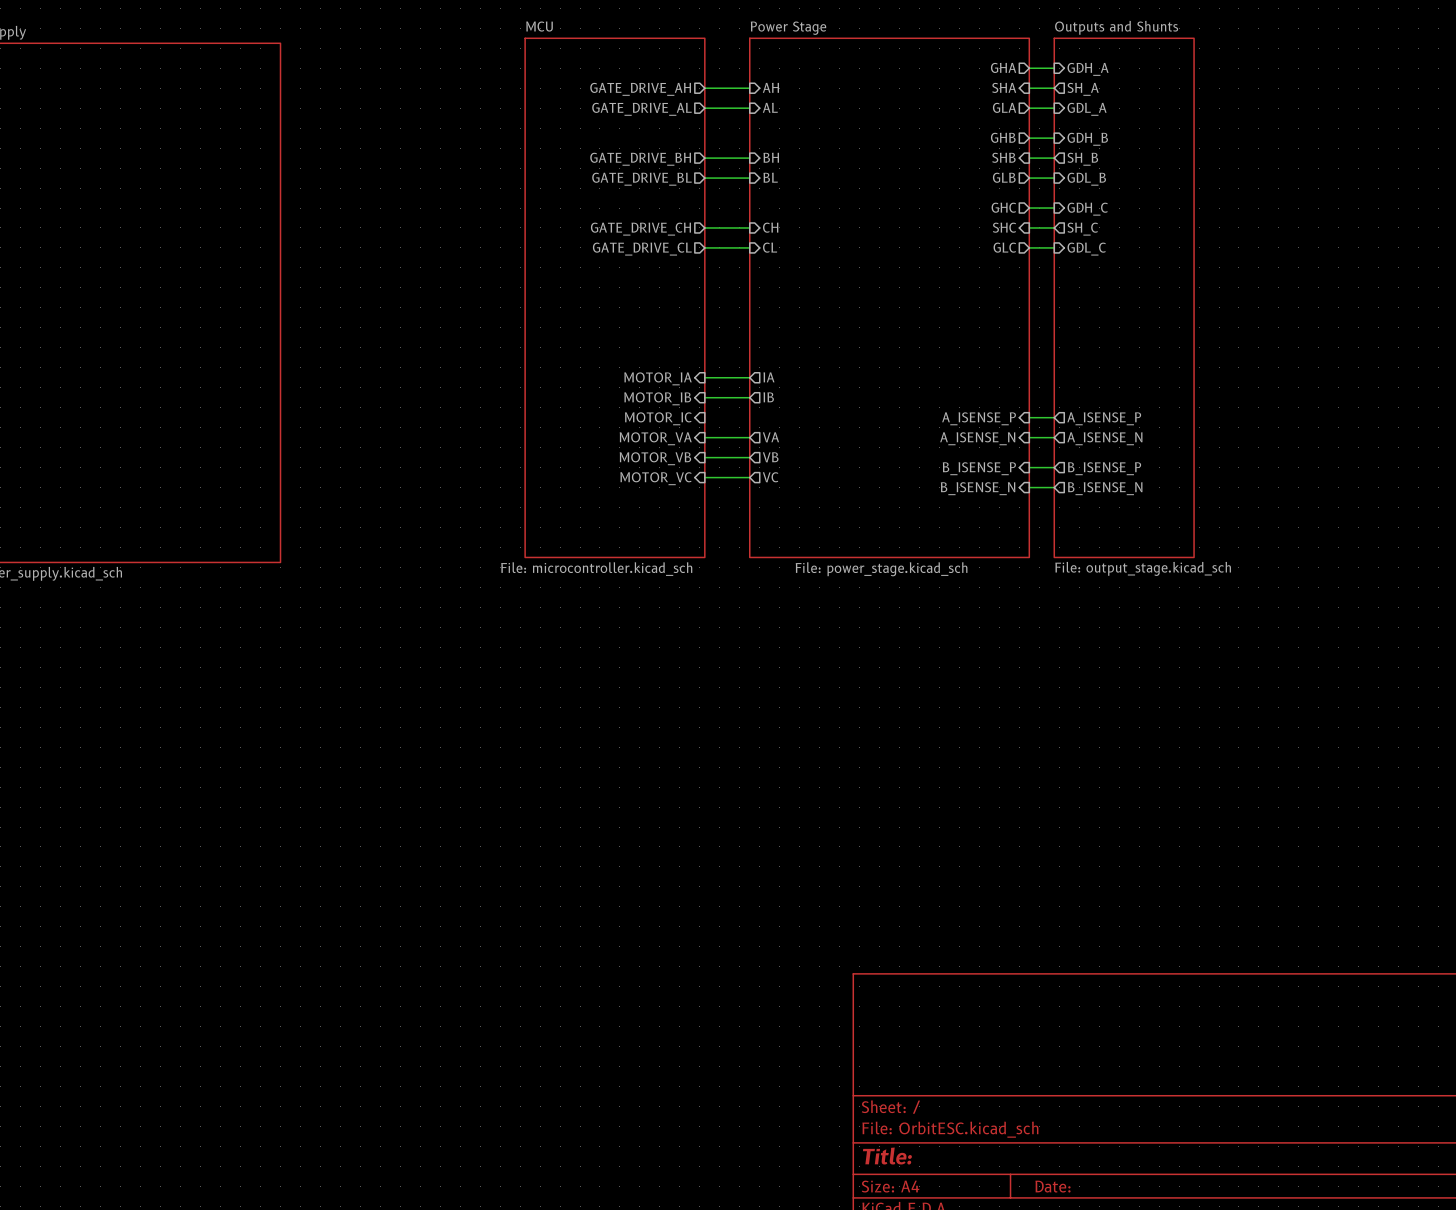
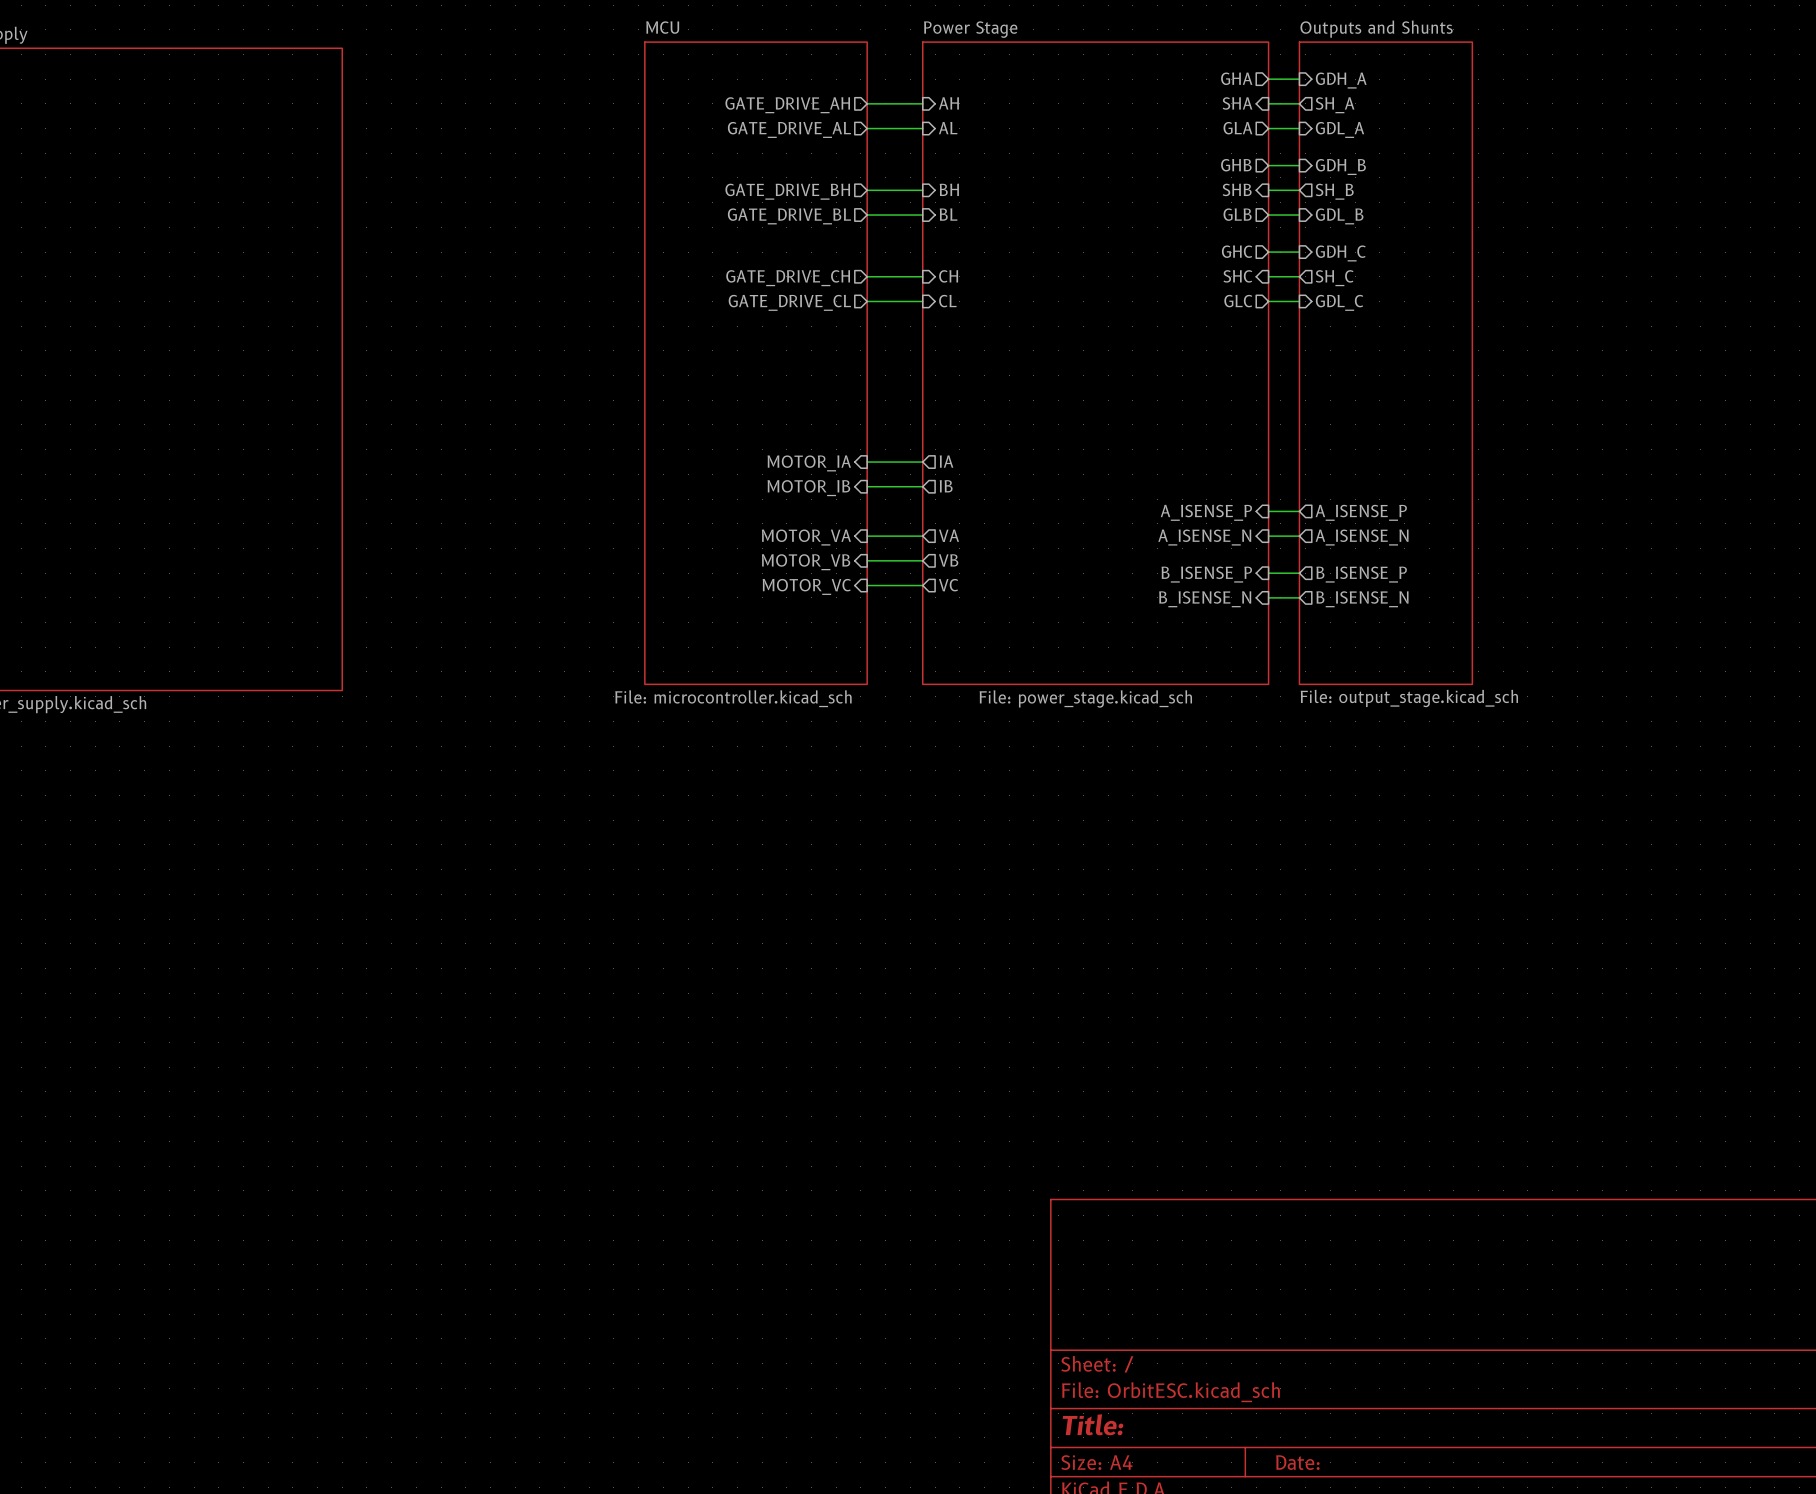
sheet pin: MOTOR_IC (658, 418) -> none

